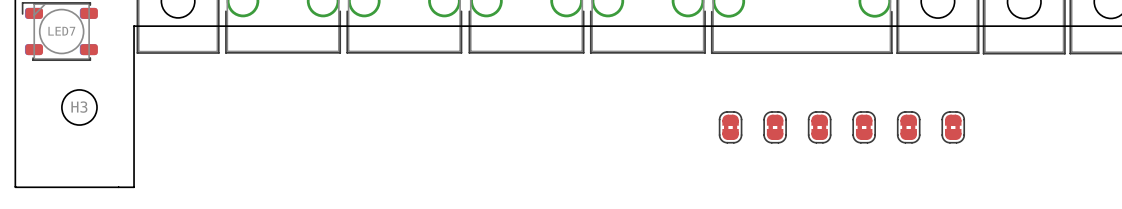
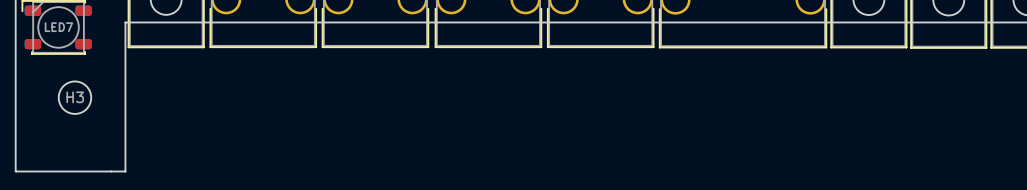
part: (730, 127) -> none
part: (775, 127) -> none
part: (819, 127) -> none
part: (864, 127) -> none
part: (908, 127) -> none
part: (953, 127) -> none

